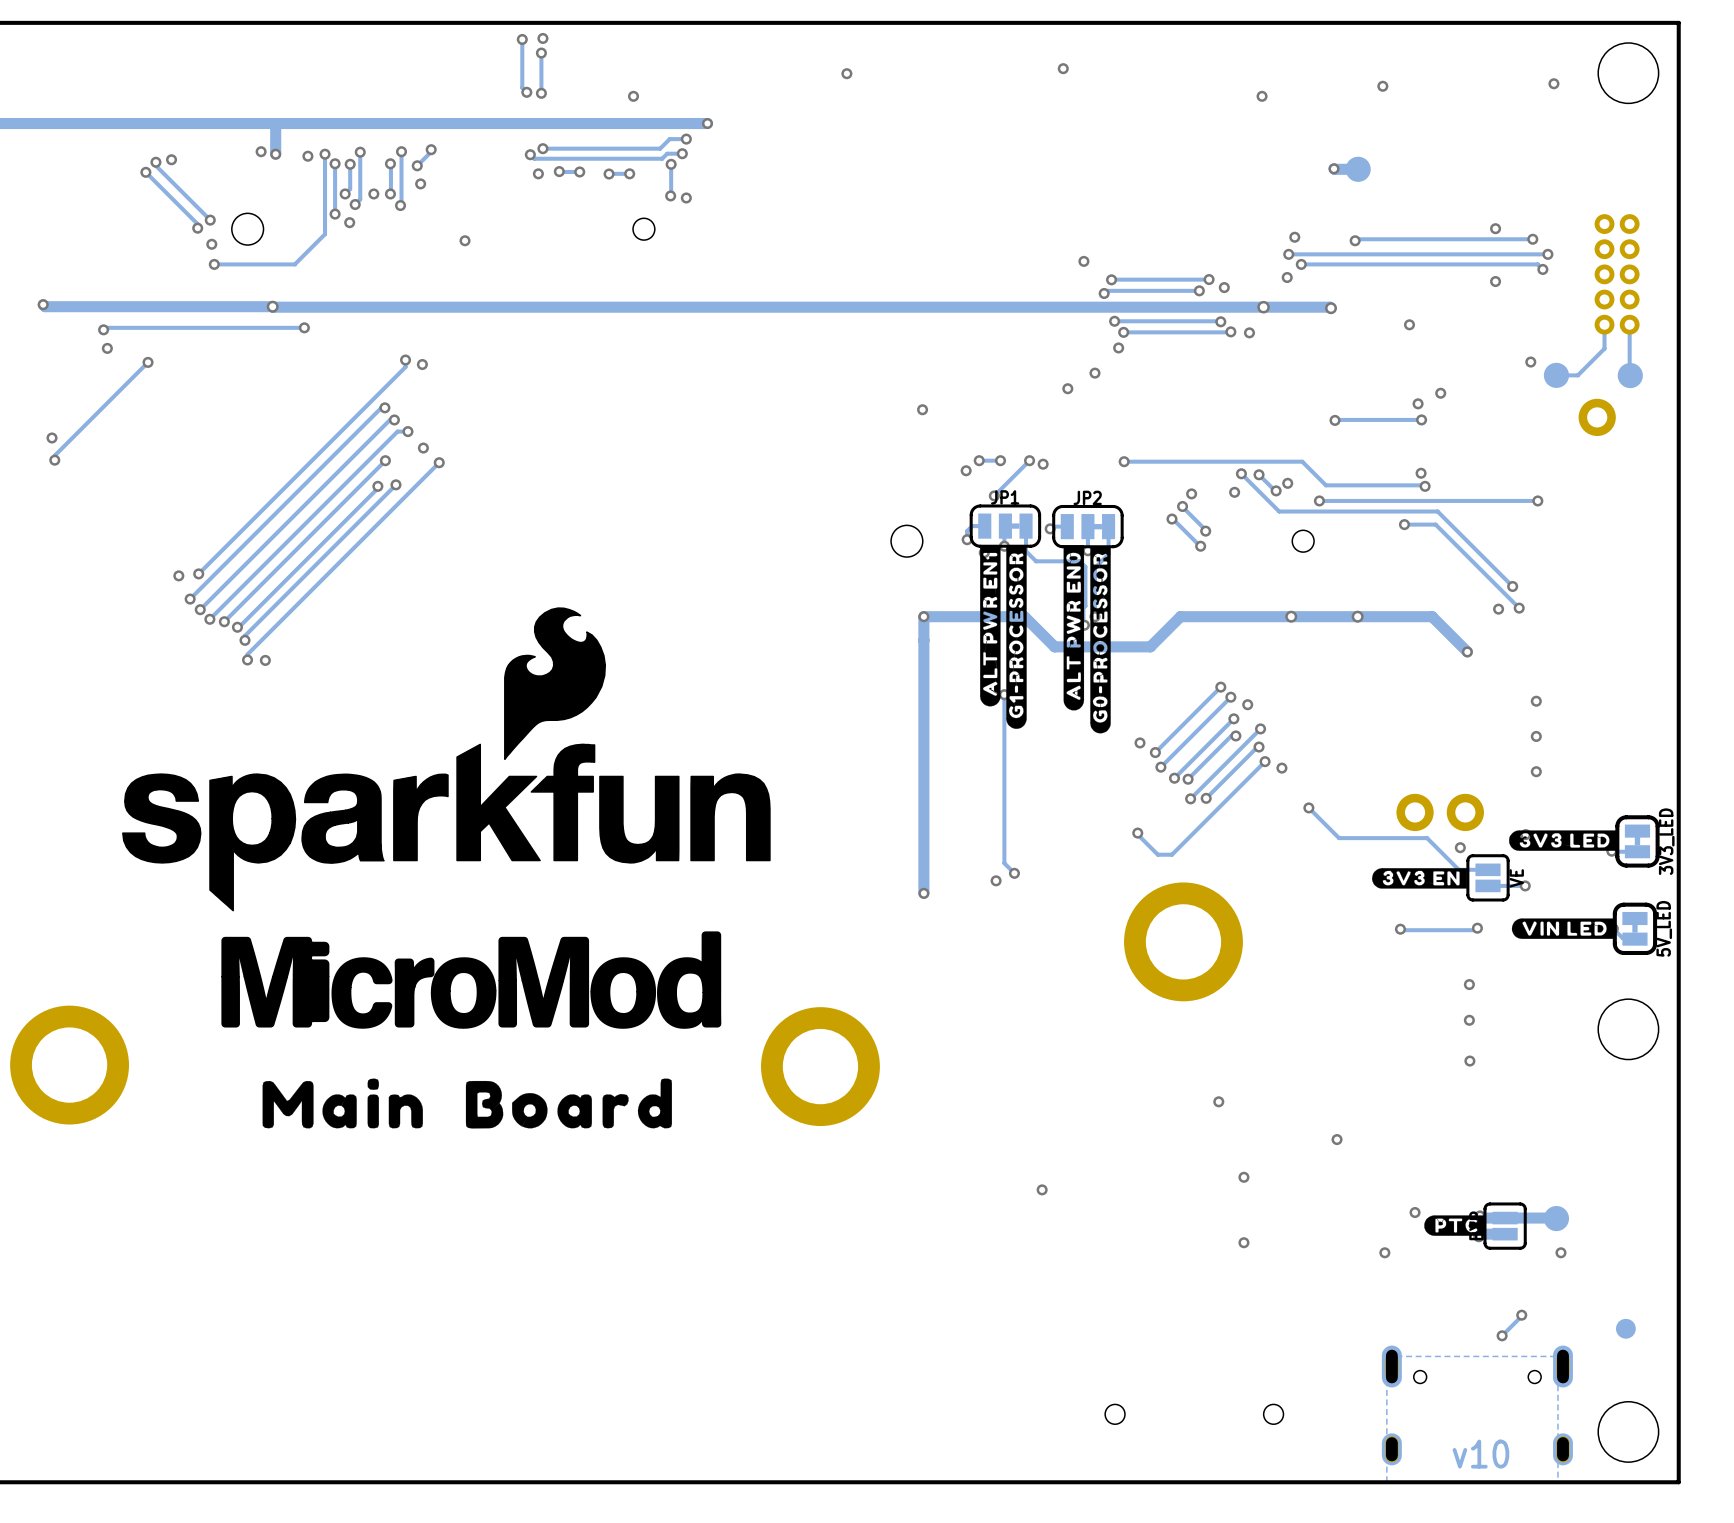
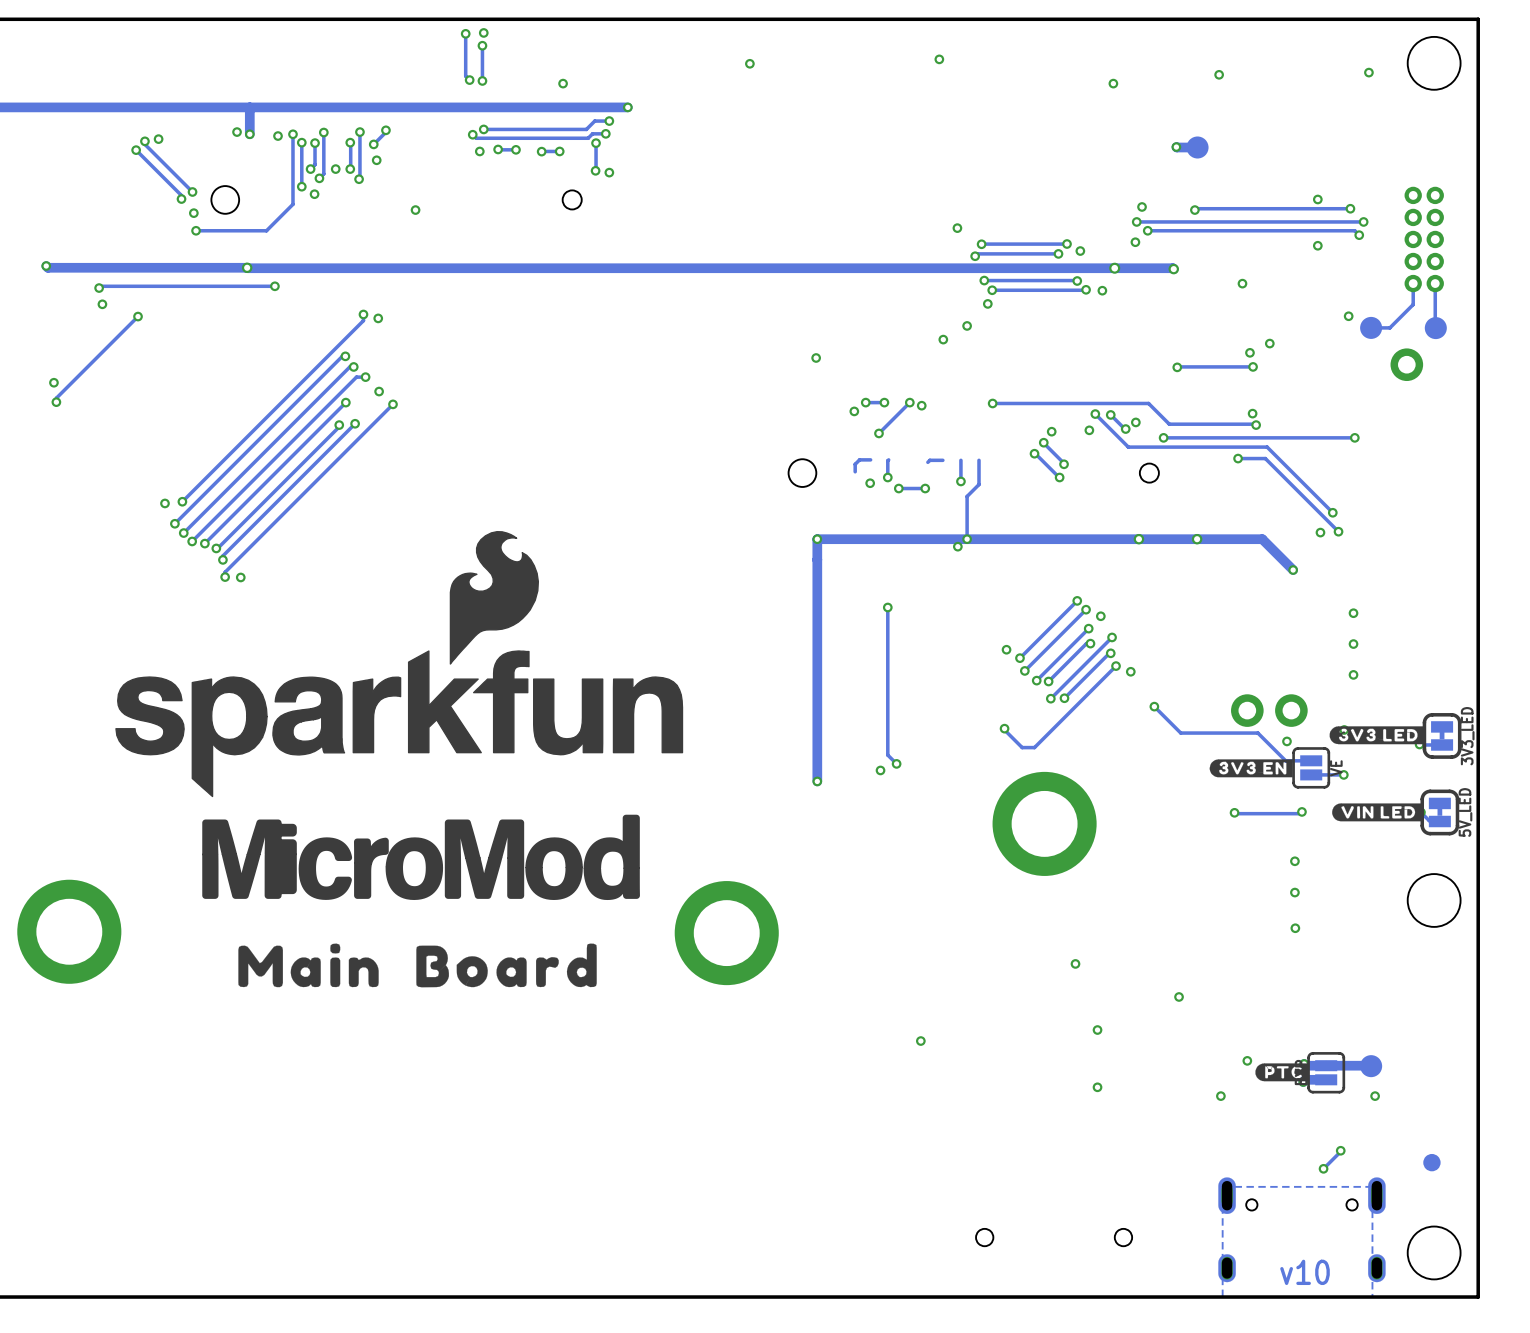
JP1: (1005, 526) -> none
track: (1026, 526) (1026, 551) (1036, 561) (1079, 561) (1085, 566) (1084, 625) -> none
JP2: (1087, 526) -> none
via: (1050, 528) -> none
via: (967, 539) -> none
drawing: [980, 545, 1027, 729] -> none
drawing: [1063, 545, 1111, 734] -> none
via: none -> (898, 488)
track: none -> (925, 488) (898, 488)
via: none -> (925, 488)
track: (1180, 616) (1150, 646) (1054, 646) (1024, 616) -> (1042, 539) (905, 539)

